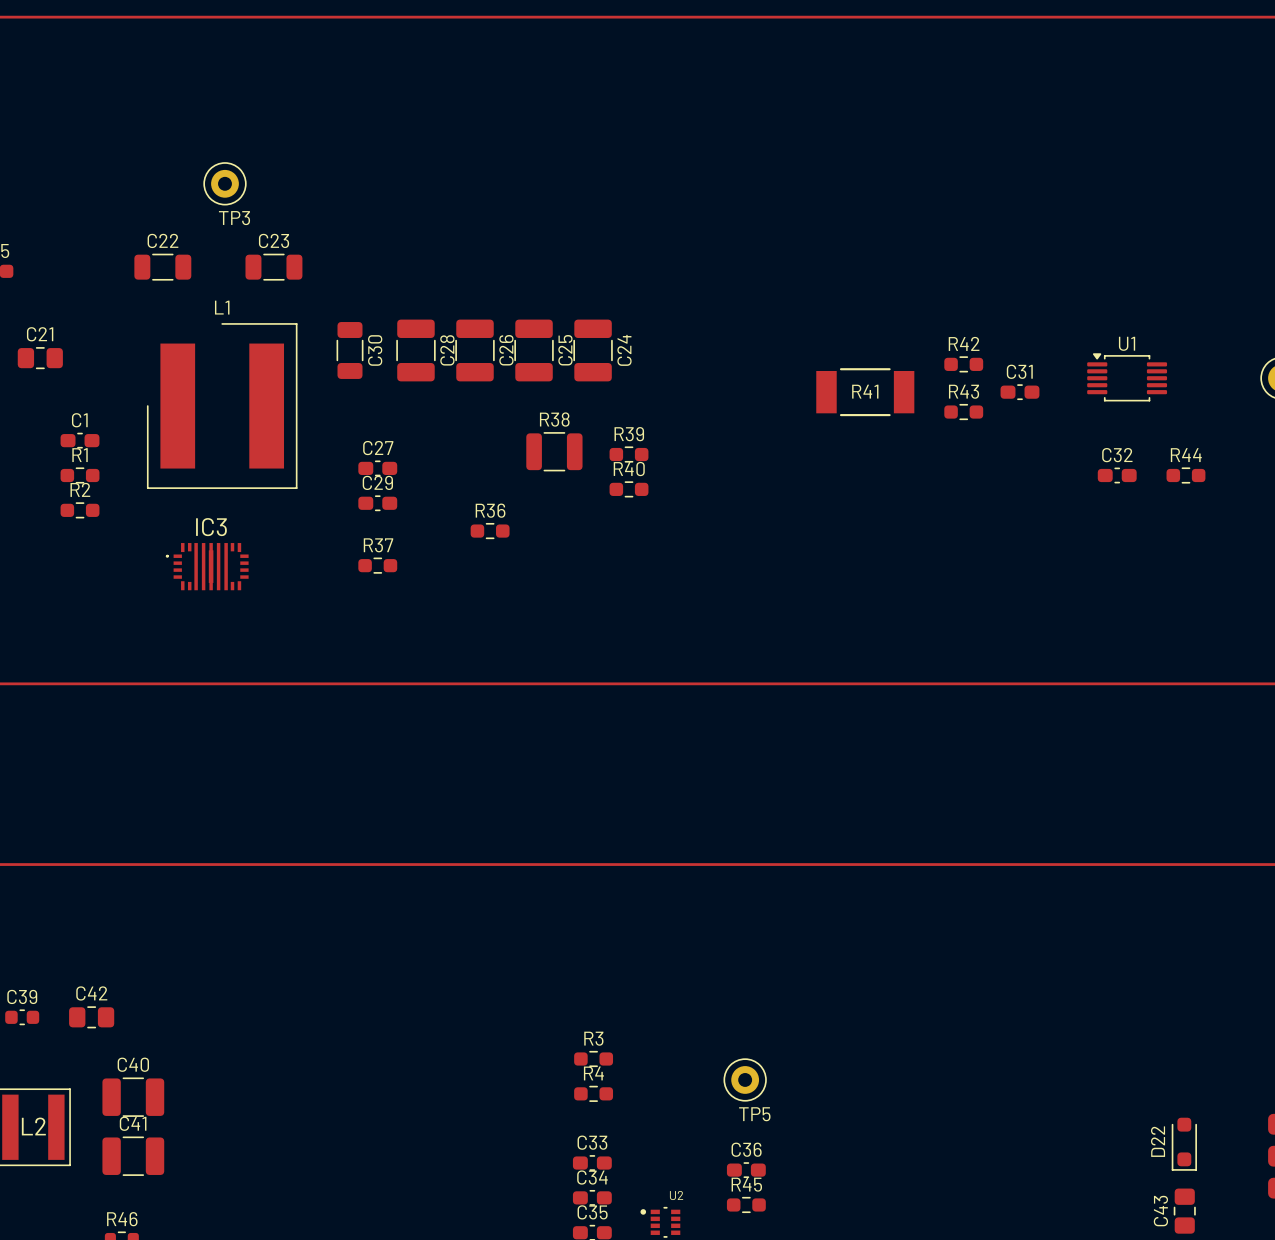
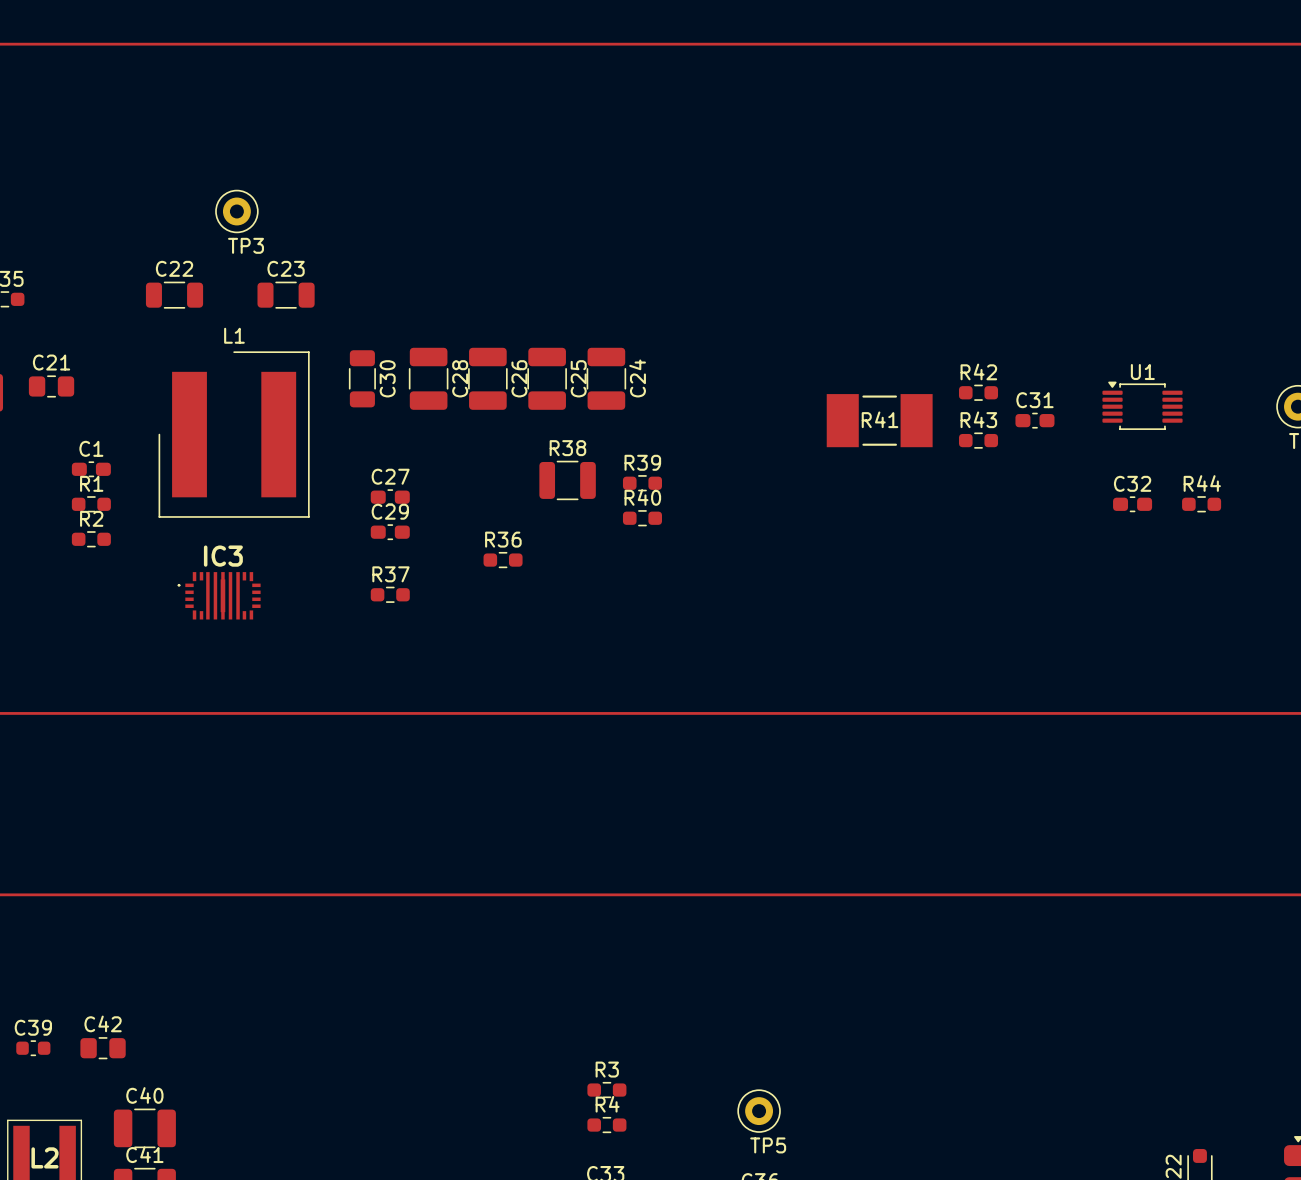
R41 footprint: [816, 368, 915, 417] -> [826, 394, 933, 448]

